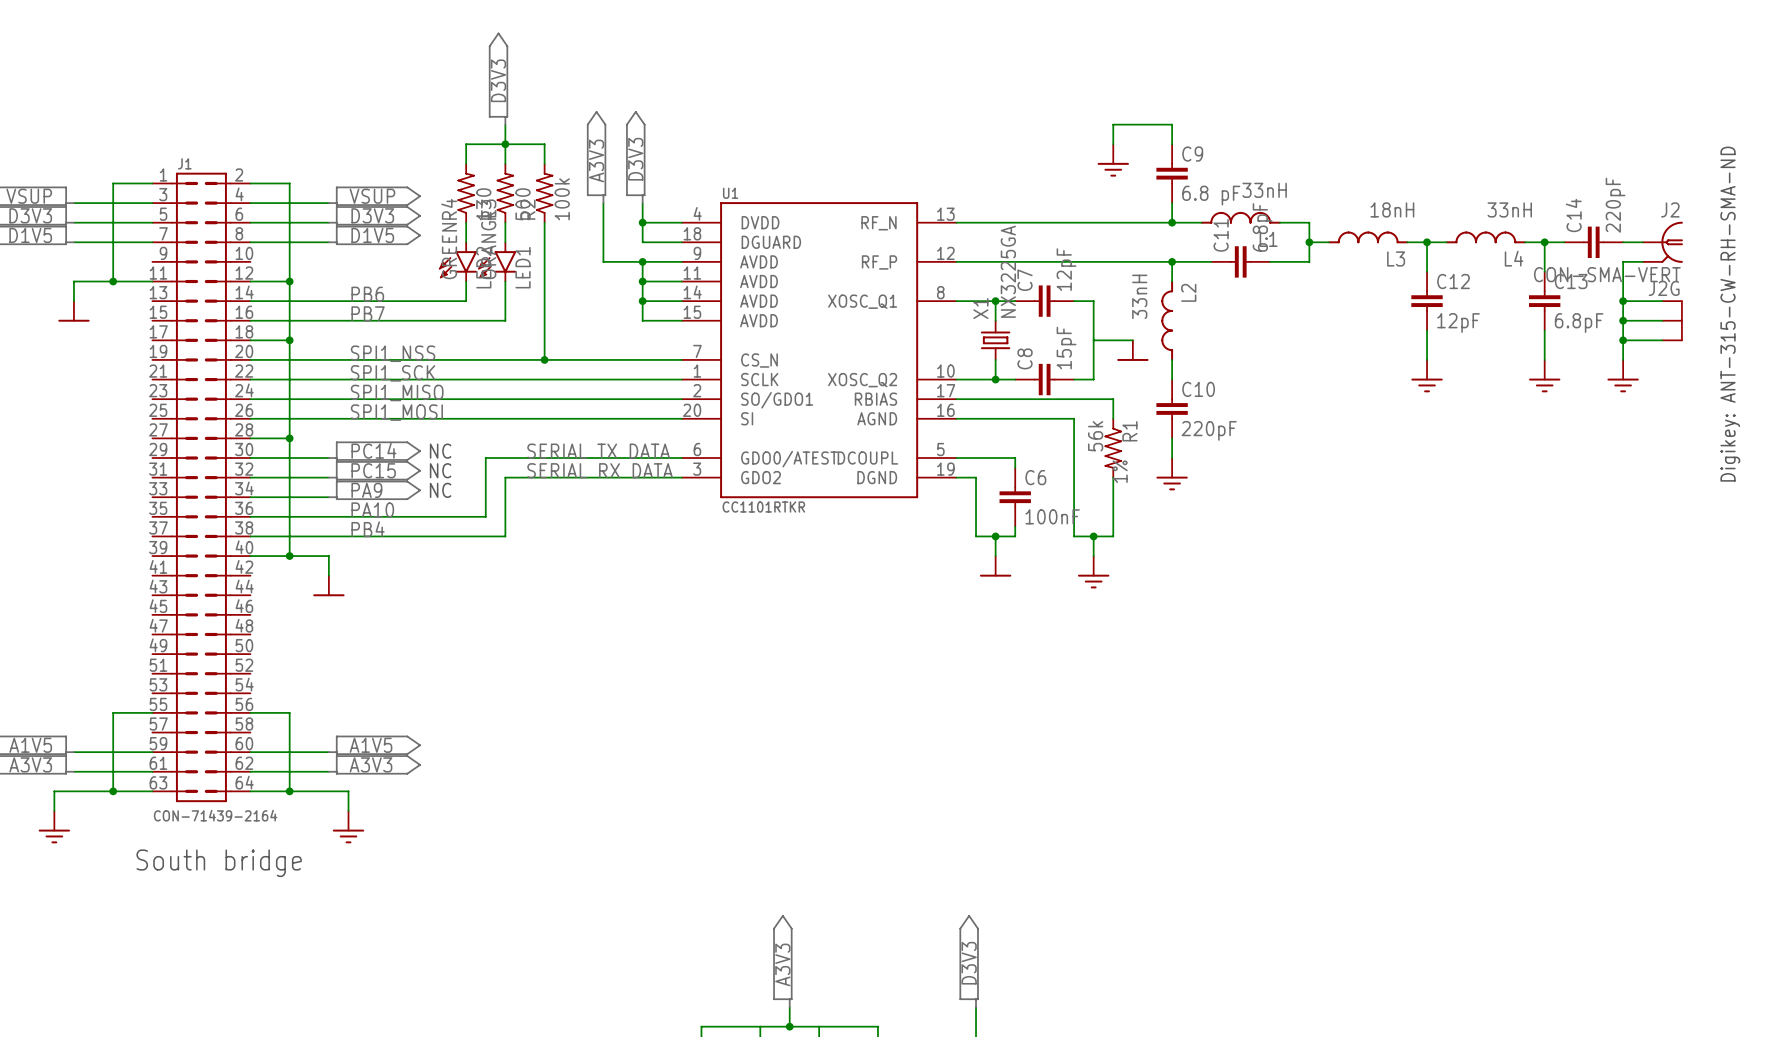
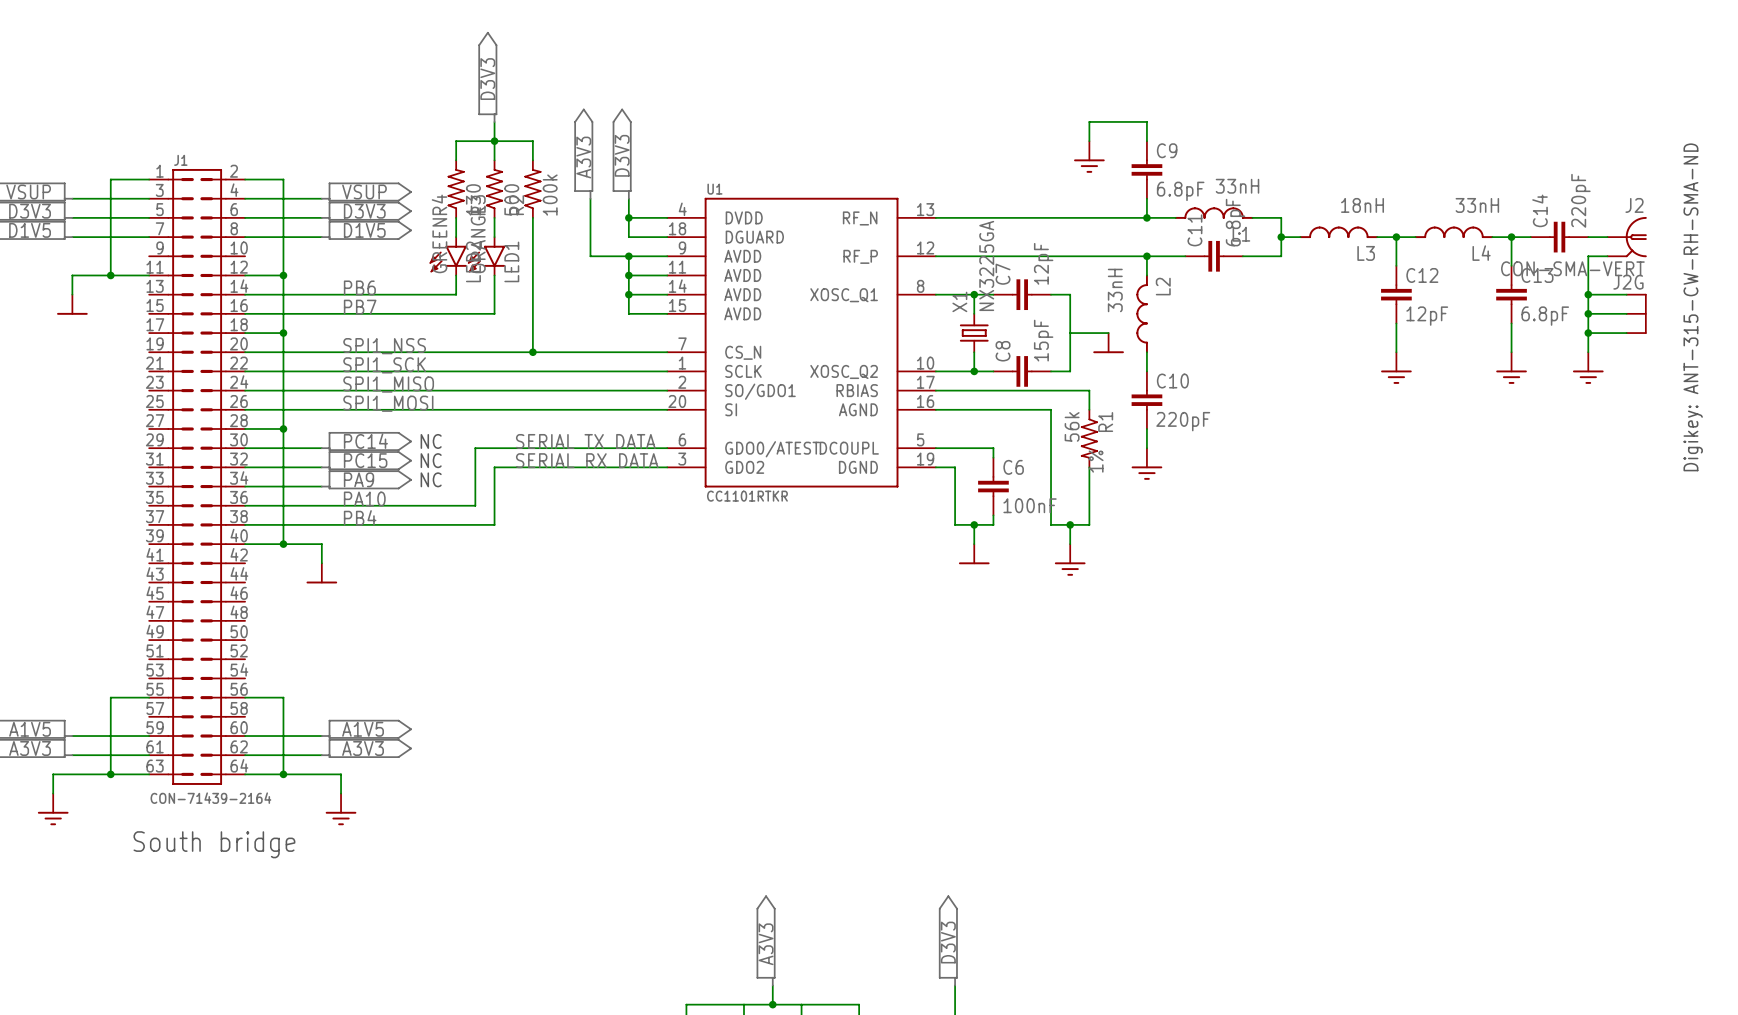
C9 value: 6.8 pF (1211, 195) -> 6.8pF (1180, 191)

